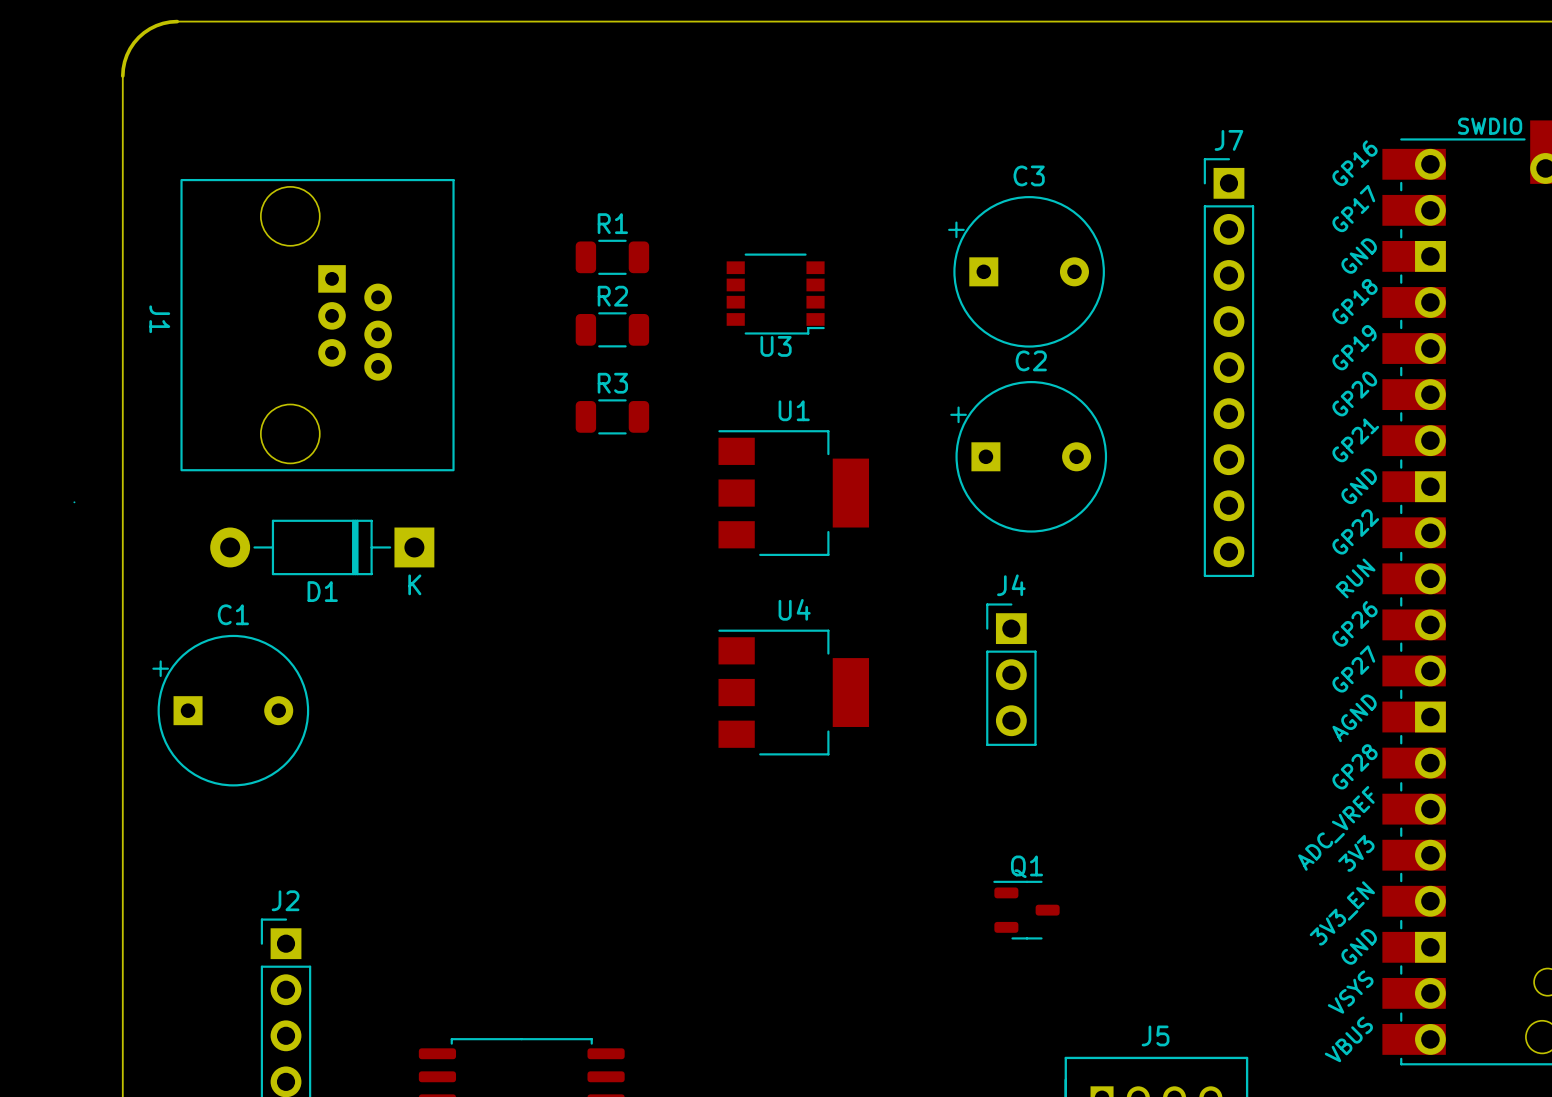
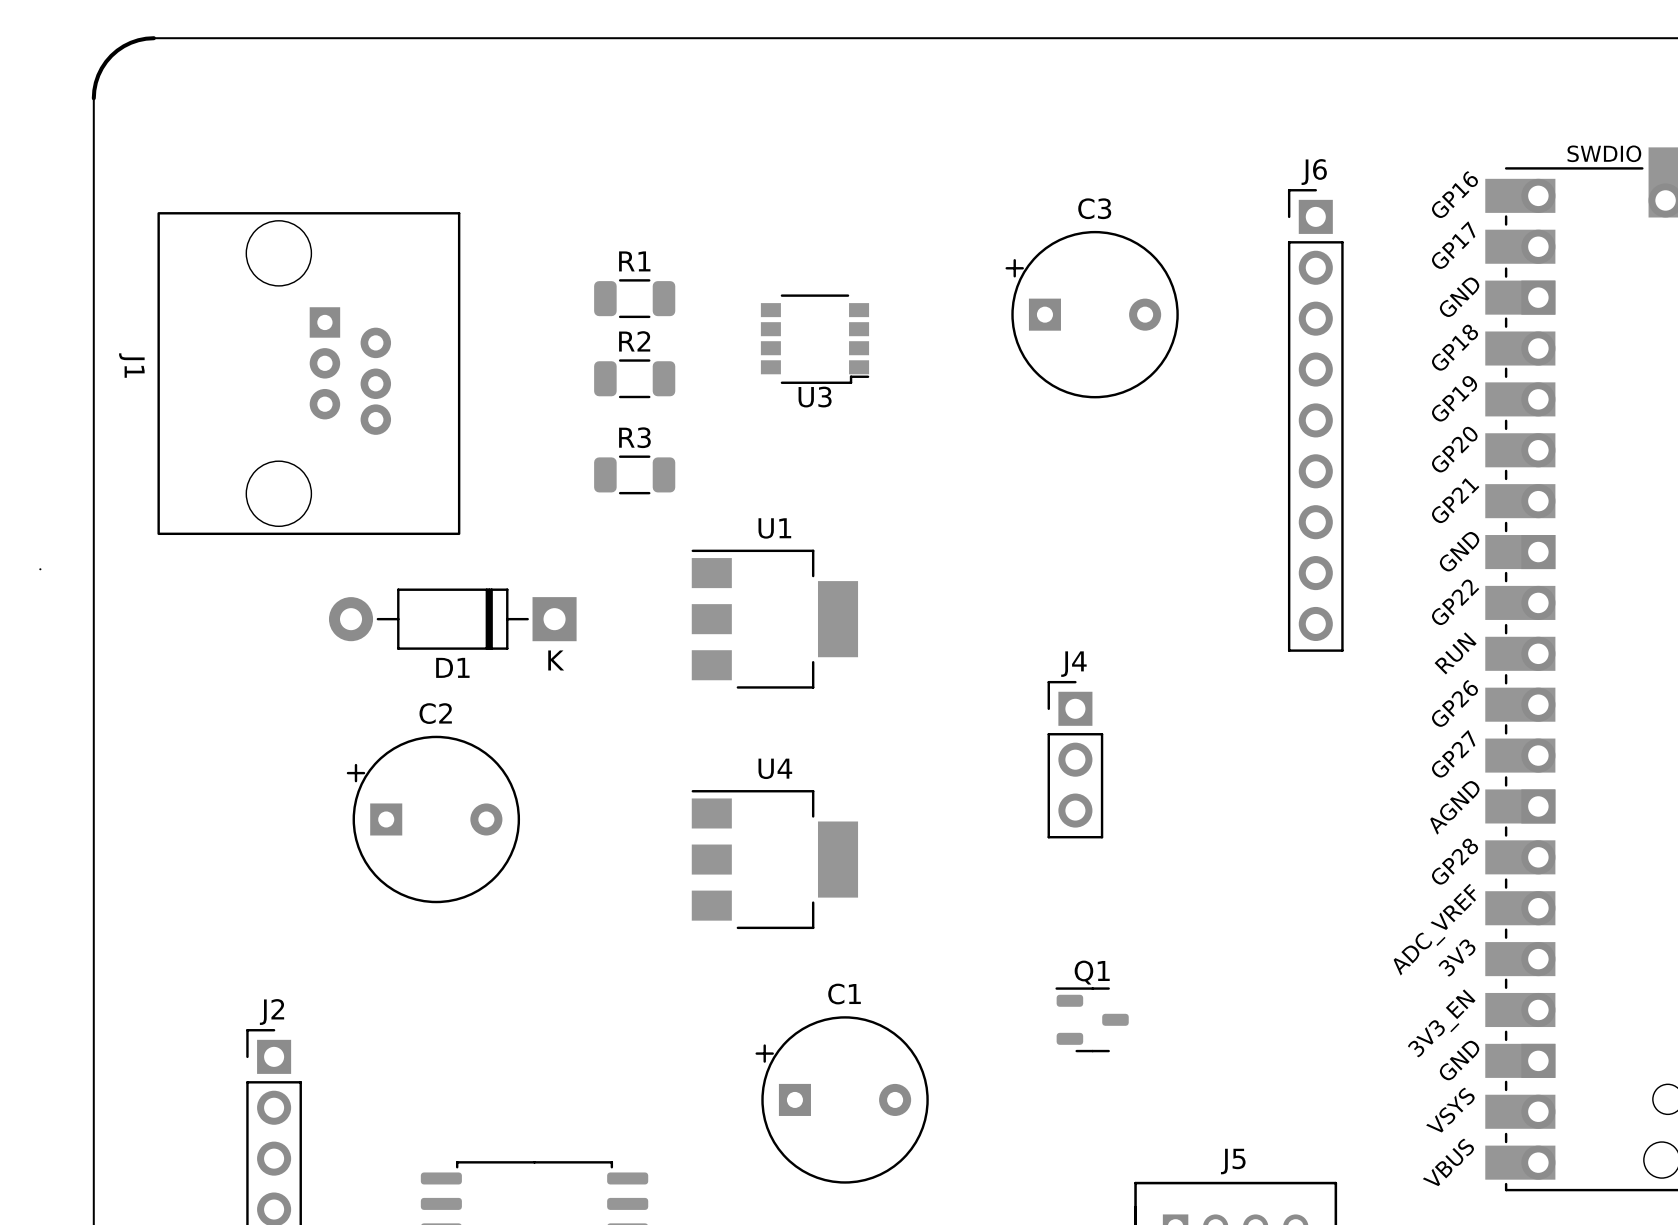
J7 name: J7 (1228, 140) -> J6 (1314, 172)
C2 position: (1028, 456) -> (433, 819)
U1 position: (793, 493) -> (774, 619)
D1 position: (322, 547) -> (452, 619)
U4 position: (793, 692) -> (774, 859)
C1 position: (230, 710) -> (842, 1099)

